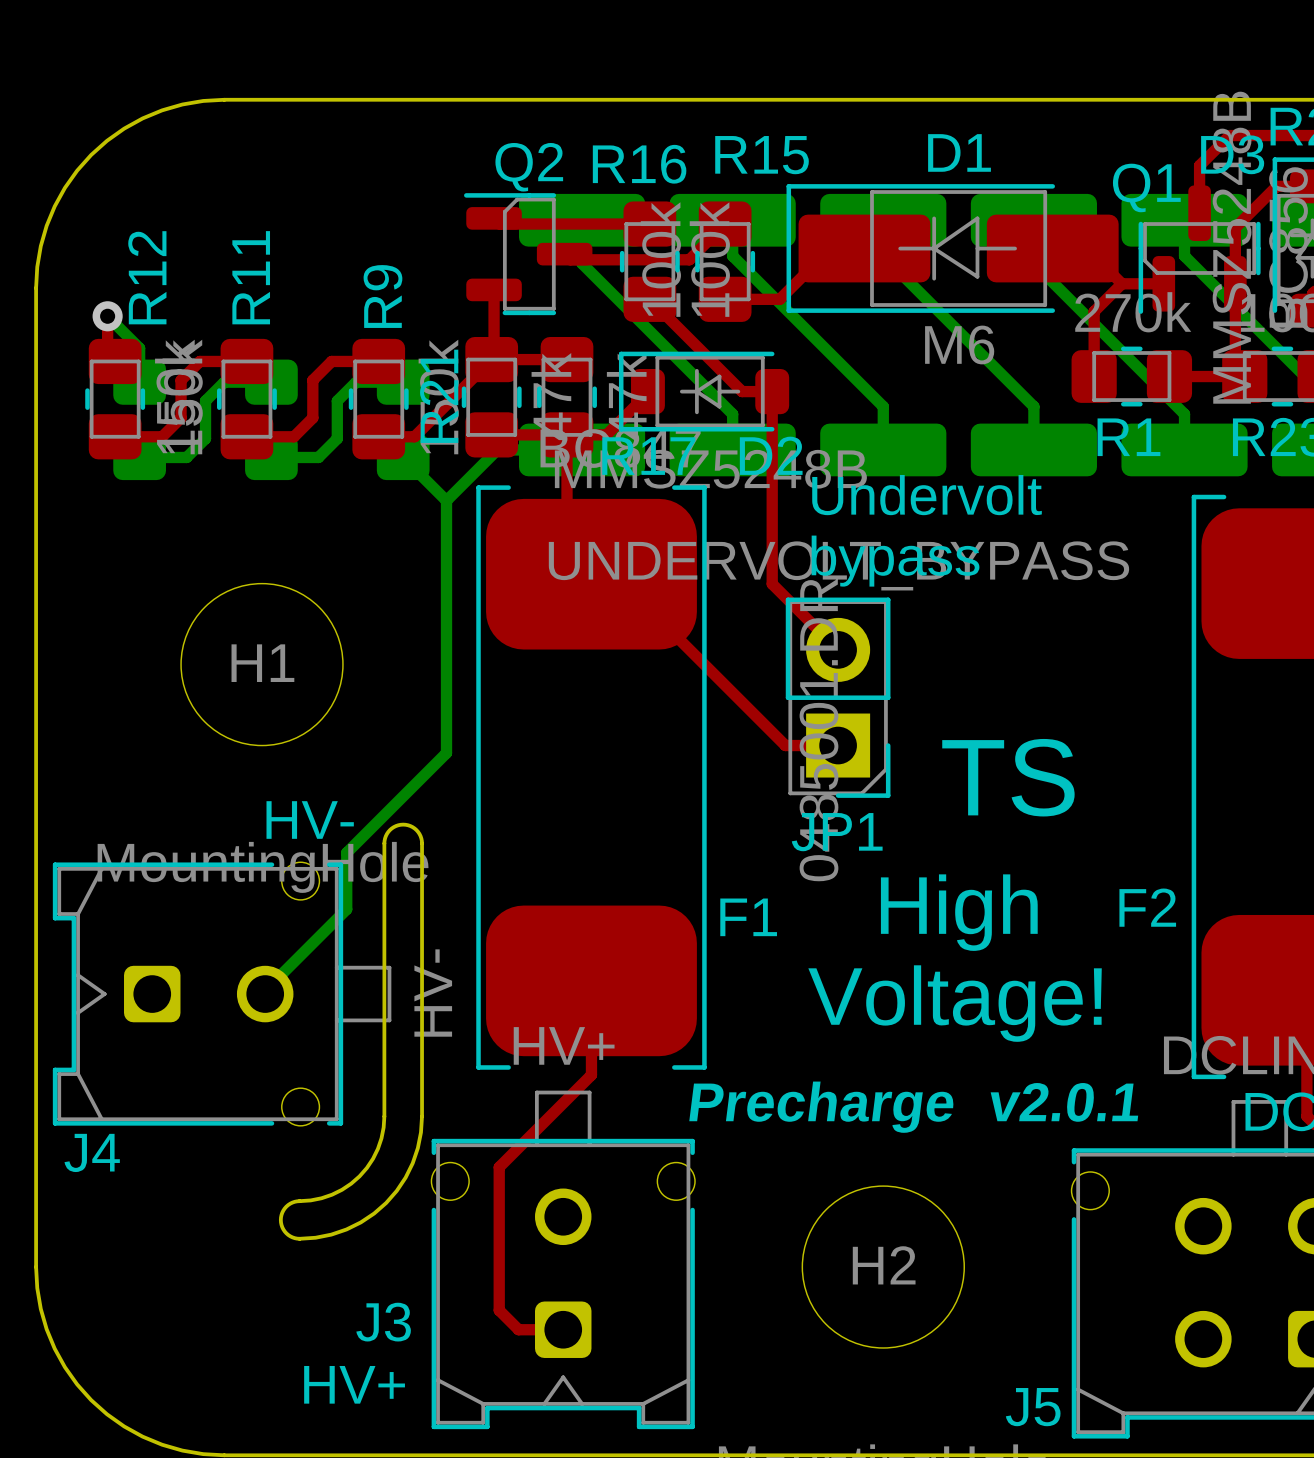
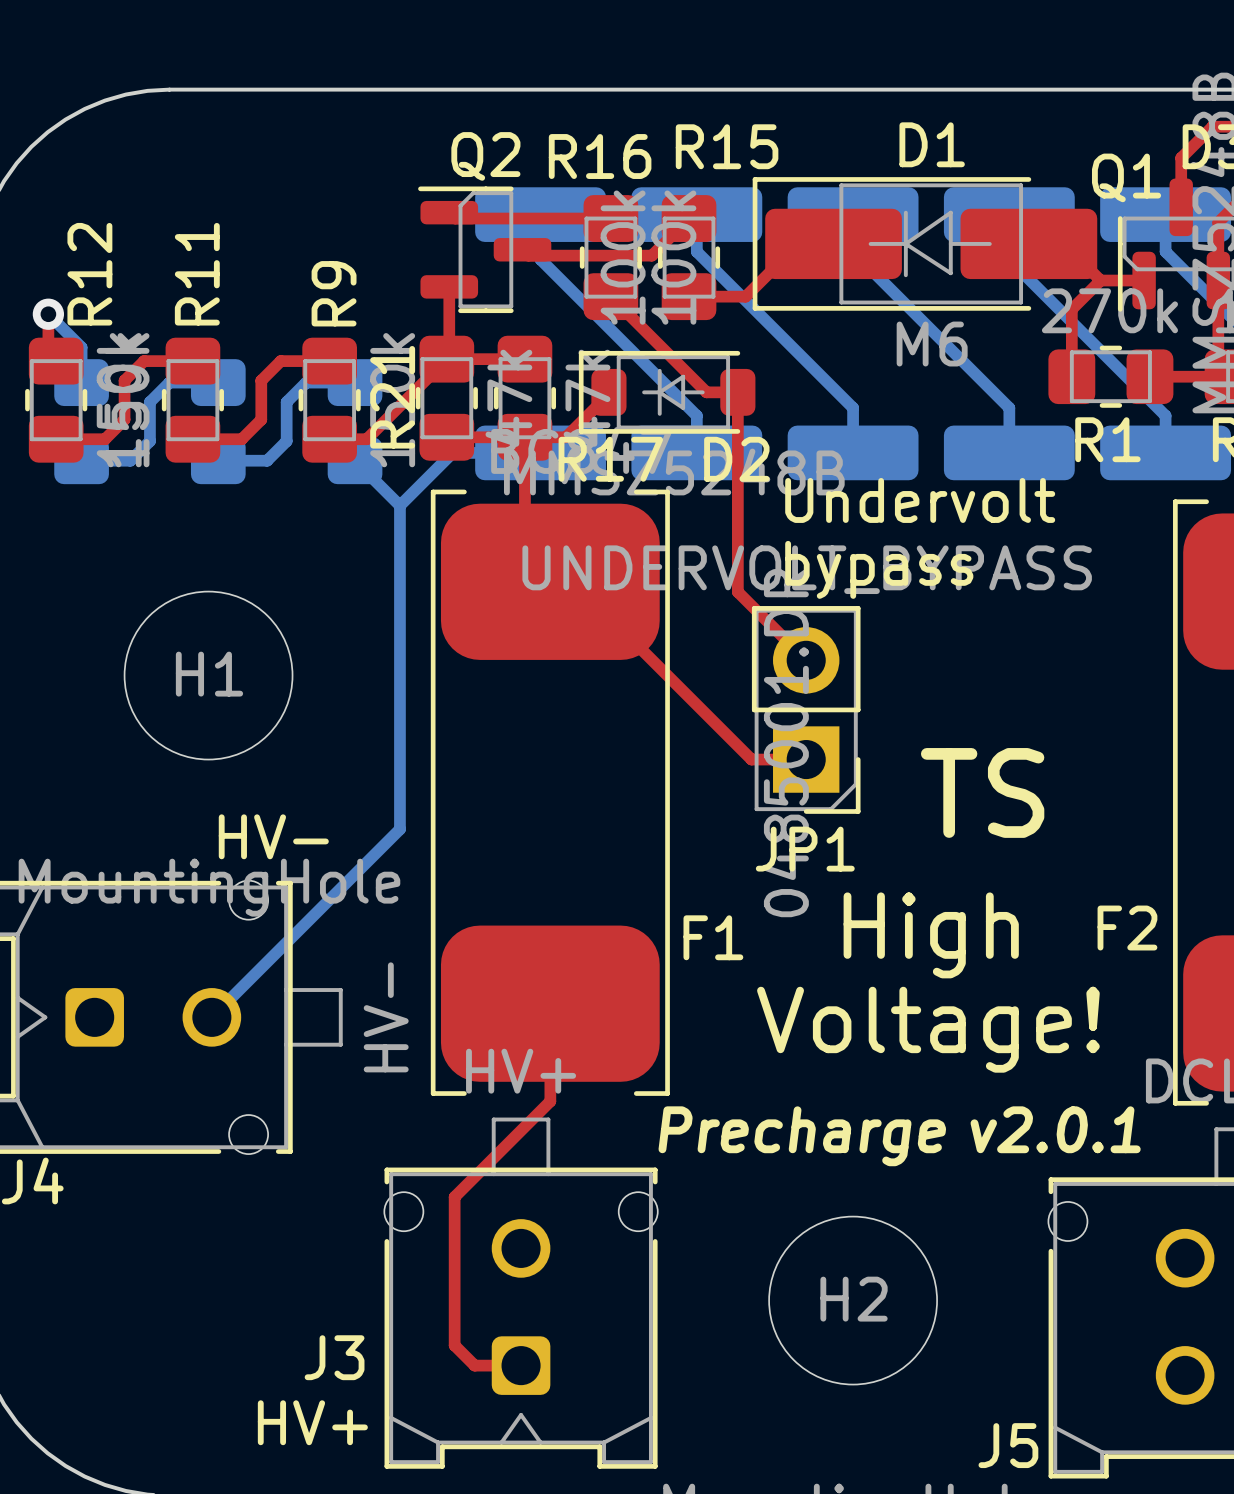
bottom track: (446, 753) (346, 852) (346, 909) (265, 990) (265, 994) -> (399, 767) (399, 829) (211, 1017)
board edge: (384, 843) (384, 1116) (381, 1138) (373, 1158) (351, 1183) (332, 1194) (310, 1200) (294, 1201) (284, 1208) (280, 1217) (282, 1227) (288, 1234) (294, 1238) (315, 1237) (331, 1234) (346, 1229) (374, 1213) (396, 1190) (405, 1177) (417, 1148) (422, 1116) (421, 840) (414, 828) (400, 824) (388, 831) (384, 843) -> none

